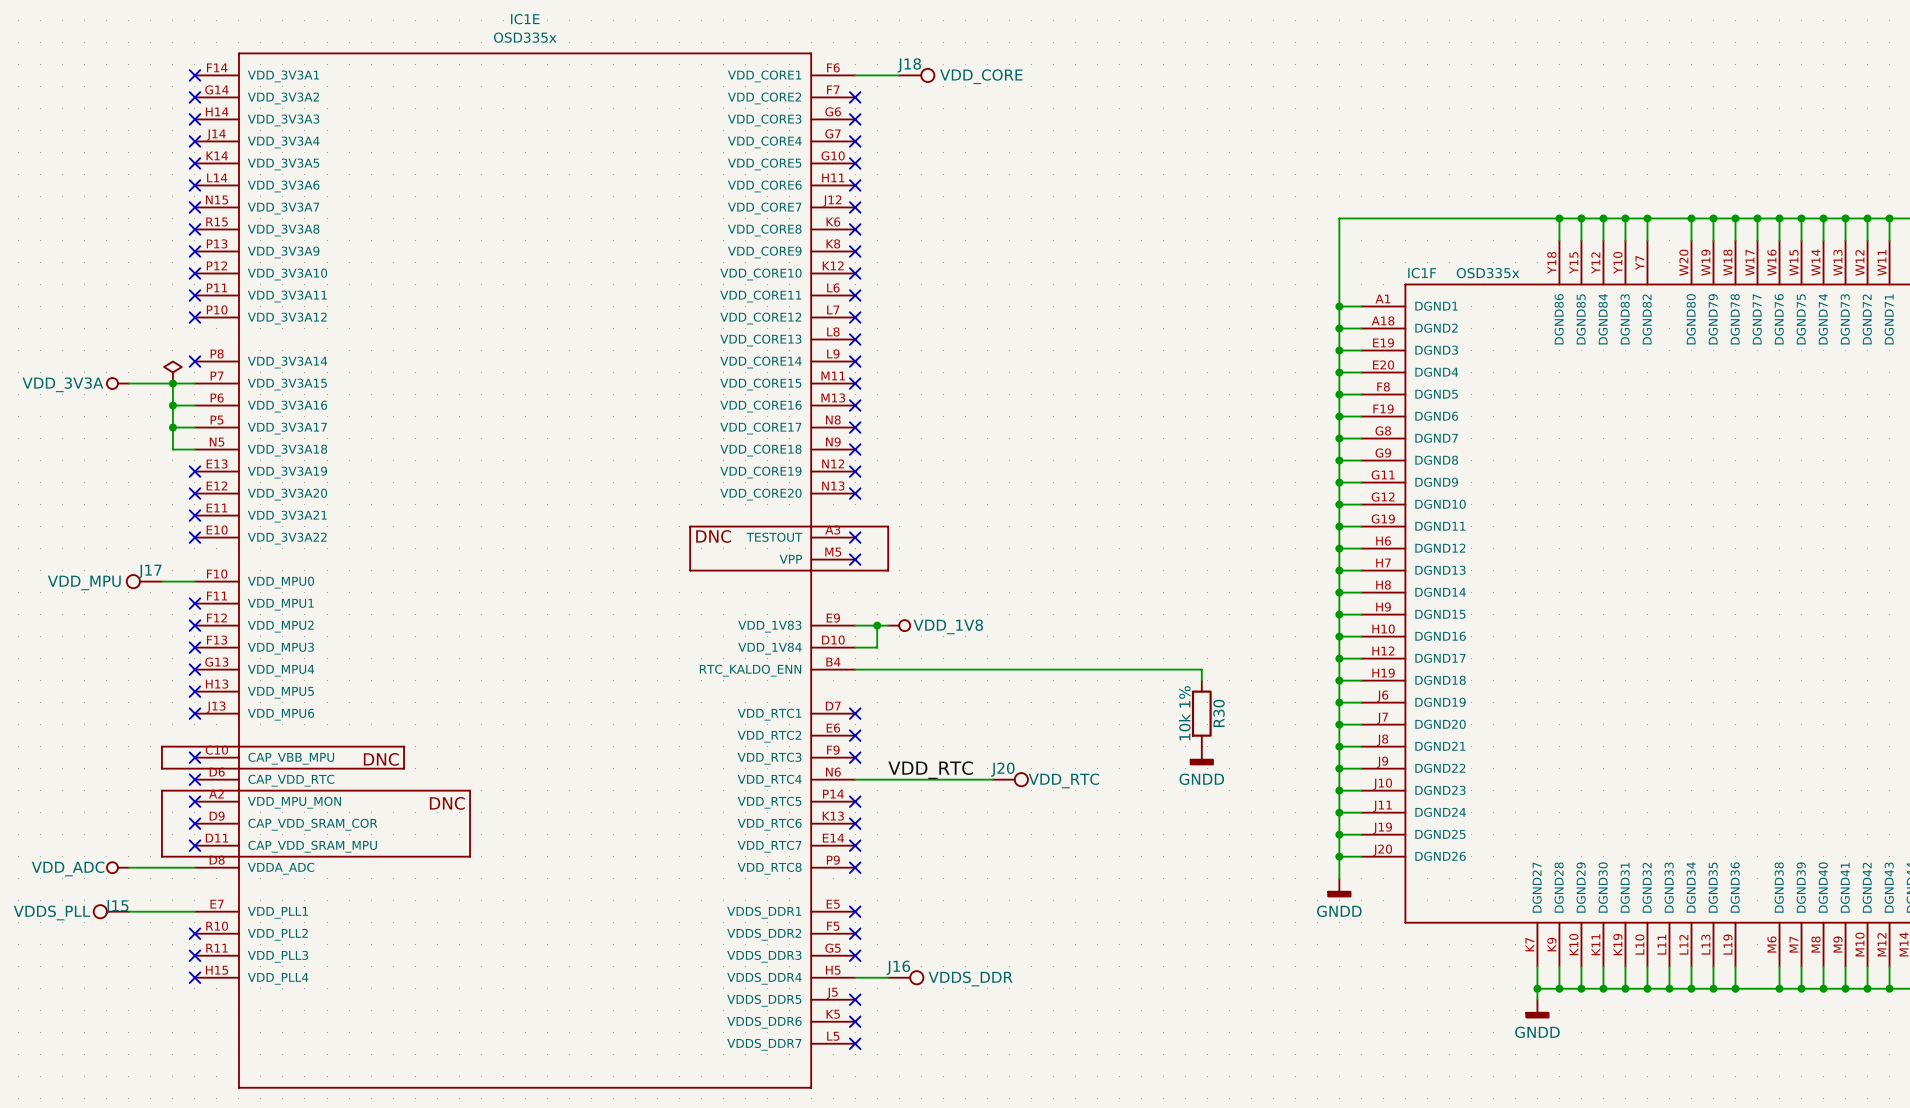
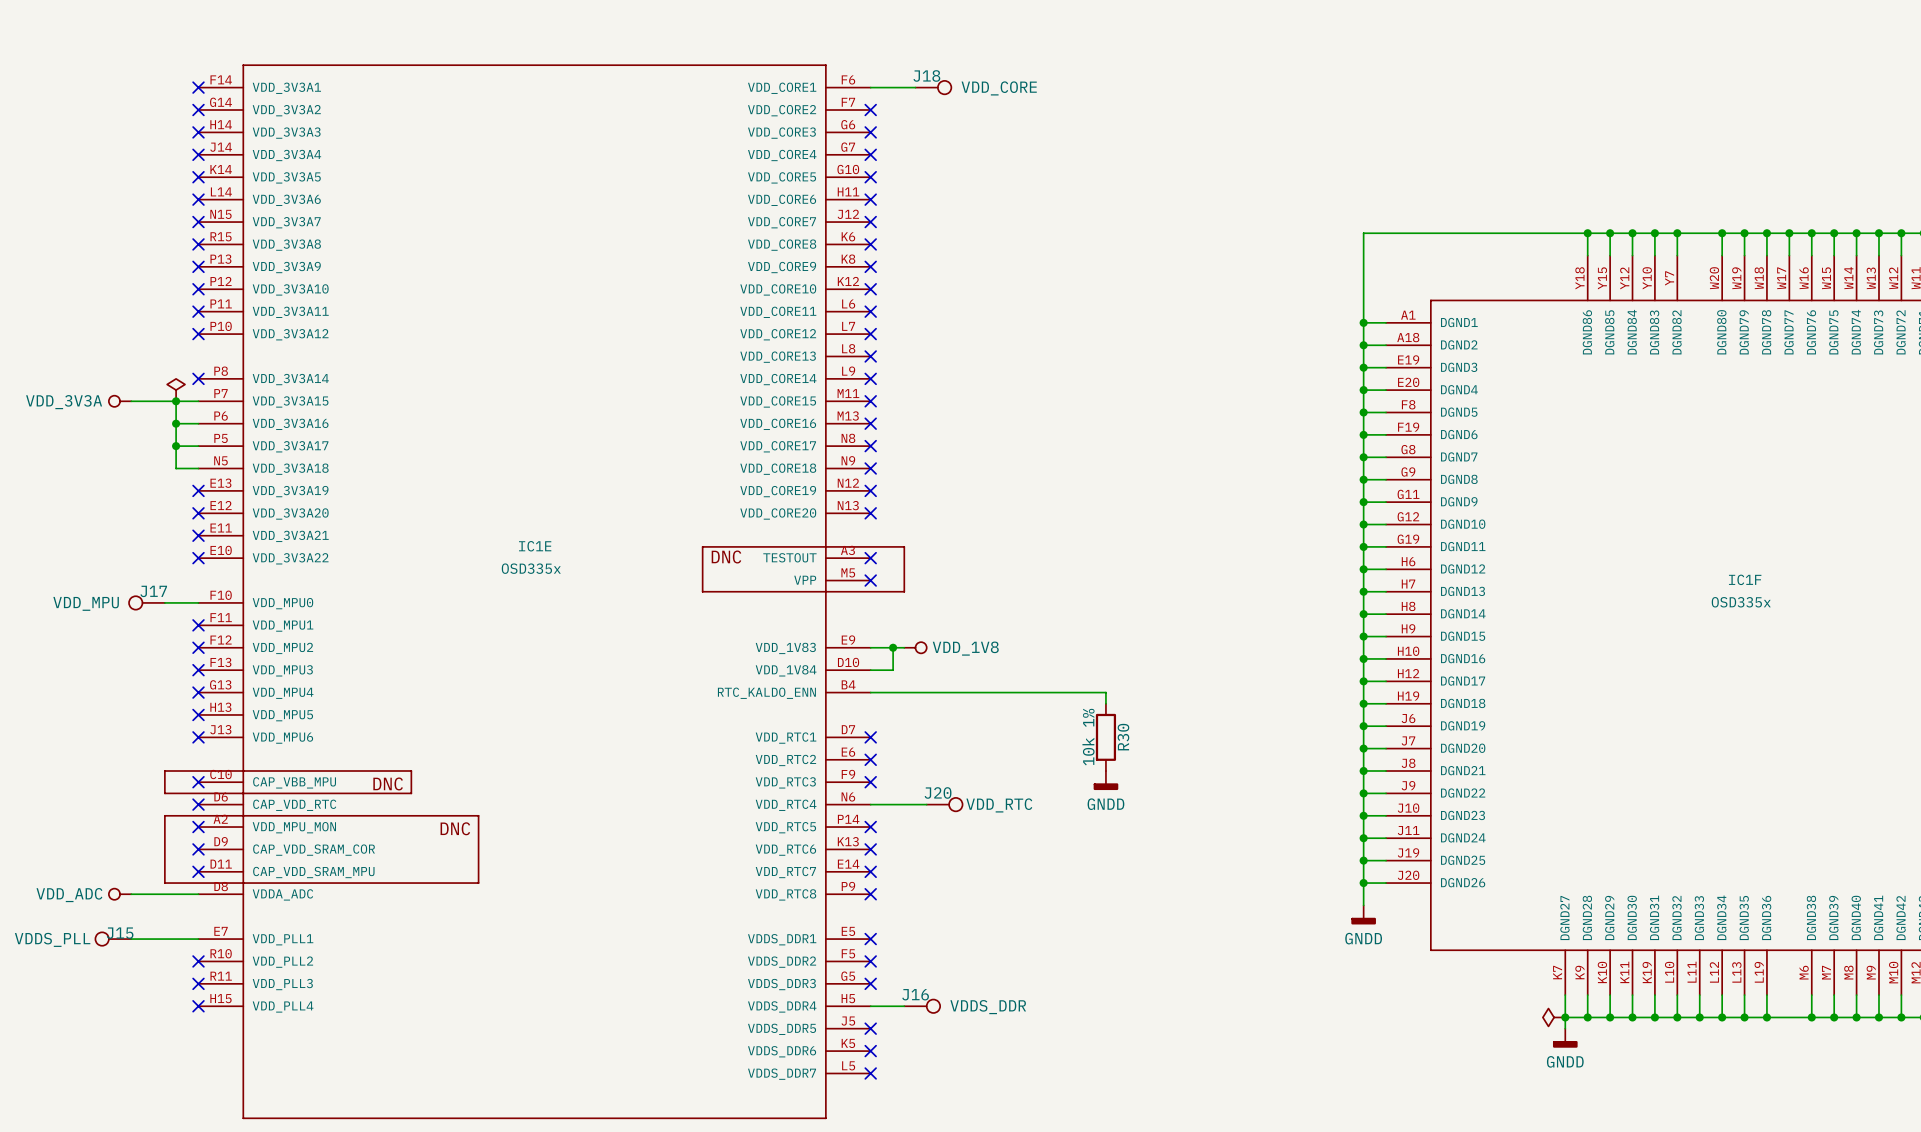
IC1E name position: IC1E (525, 19) -> IC1E (535, 546)
IC1E value position: OSD335x (525, 37) -> OSD335x (531, 568)
IC1F name position: IC1F (1422, 273) -> IC1F (1745, 579)
IC1F value position: OSD335x (1488, 273) -> OSD335x (1741, 602)
wire: (1086, 669) (1201, 669) (1201, 680) -> (1105, 692) (1105, 703)
R30 position: (1201, 713) -> (1105, 737)
power symbol position: GNDD (1201, 756) -> GNDD (1105, 780)
label: VDD_RTC (930, 770) -> none
wire: (910, 779) (992, 779) -> none
J20 position: (1010, 779) -> (944, 804)
power symbol: none -> (1554, 1017)

